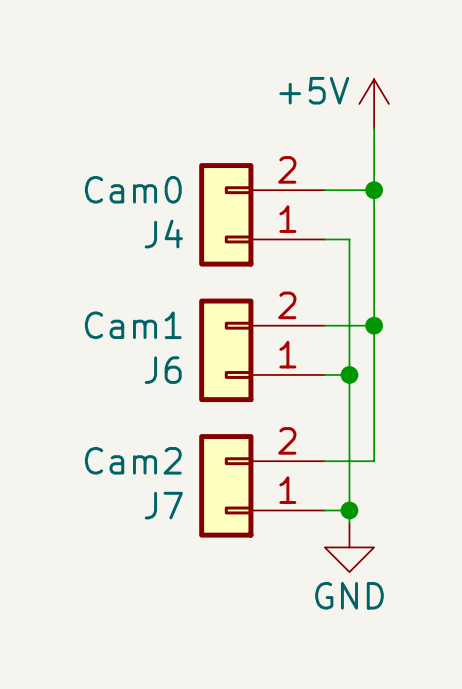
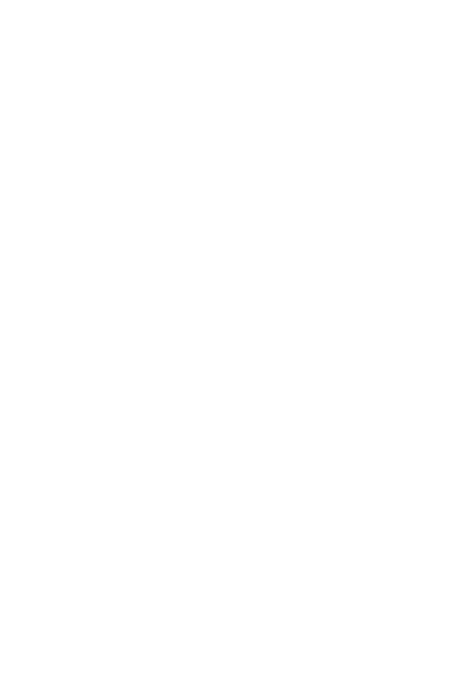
power symbol: +5V (374, 103) -> none
wire: (374, 128) (374, 461) (324, 461) -> none
wire: (324, 190) (374, 190) -> none
junction: (374, 190) -> none
J4: Cam0 (262, 214) -> none
wire: (324, 239) (349, 239) (349, 522) -> none
wire: (324, 325) (374, 325) -> none
junction: (374, 325) -> none
J6: Cam1 (262, 350) -> none
wire: (324, 374) (349, 374) -> none
junction: (349, 374) -> none
J7: Cam2 (262, 485) -> none
wire: (324, 510) (349, 510) -> none
junction: (349, 510) -> none
power symbol: GND (349, 547) -> none

